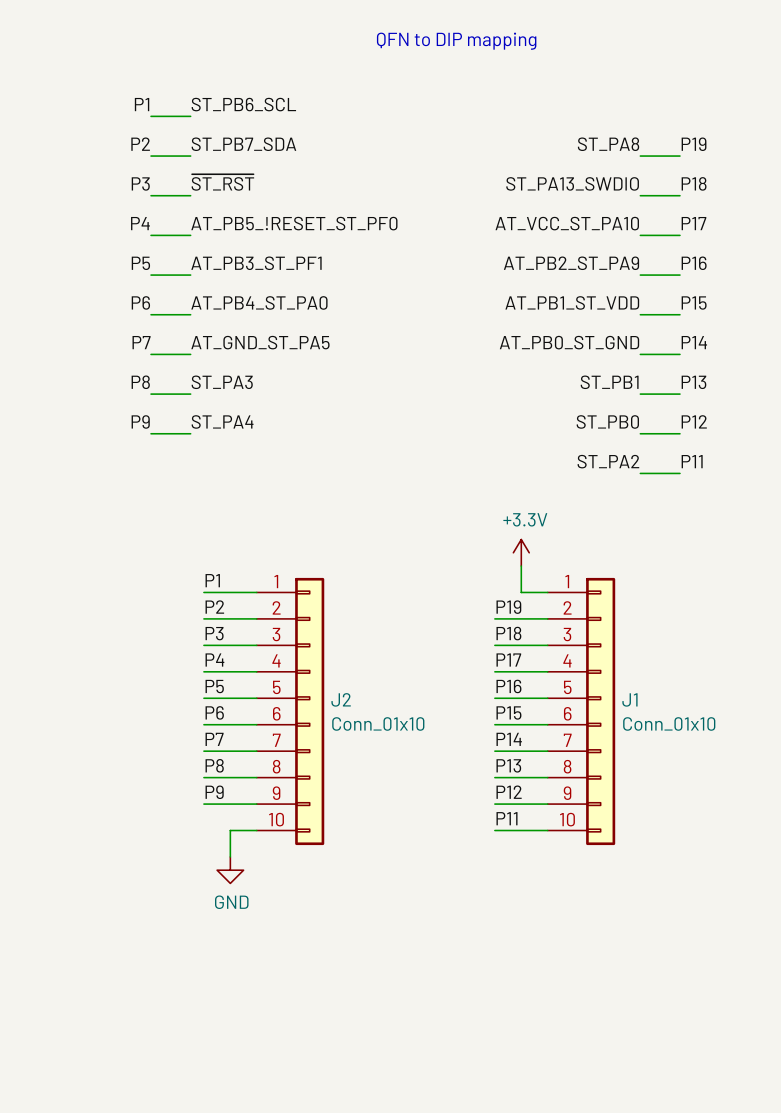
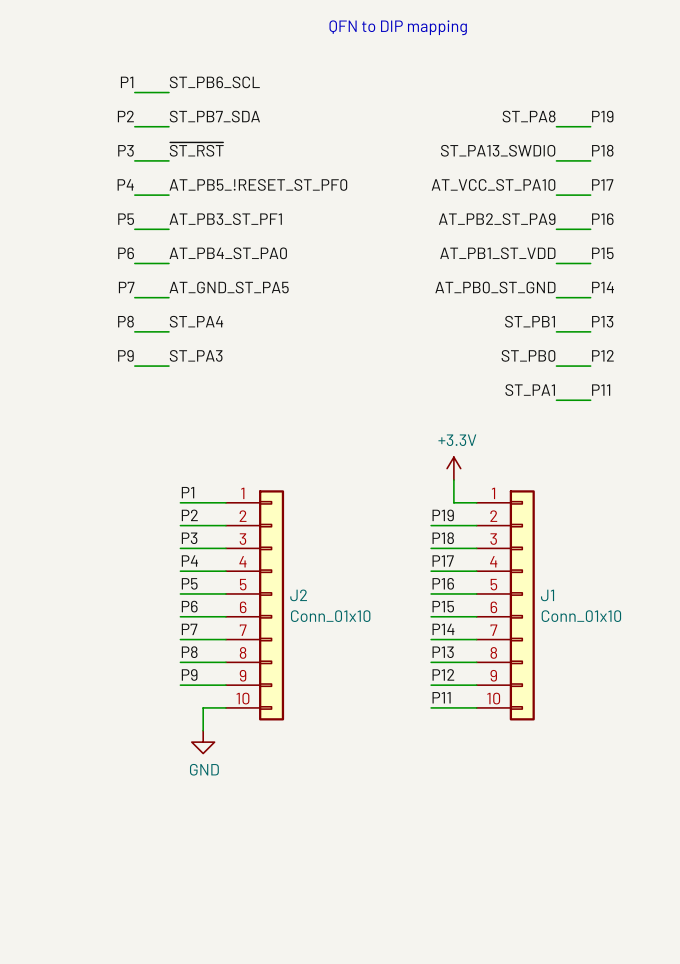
label: ST_PA3 (222, 382) -> ST_PA4 (196, 321)
label: ST_PA4 (222, 421) -> ST_PA3 (196, 355)
label: ST_PA2 (608, 461) -> ST_PA1 (530, 390)

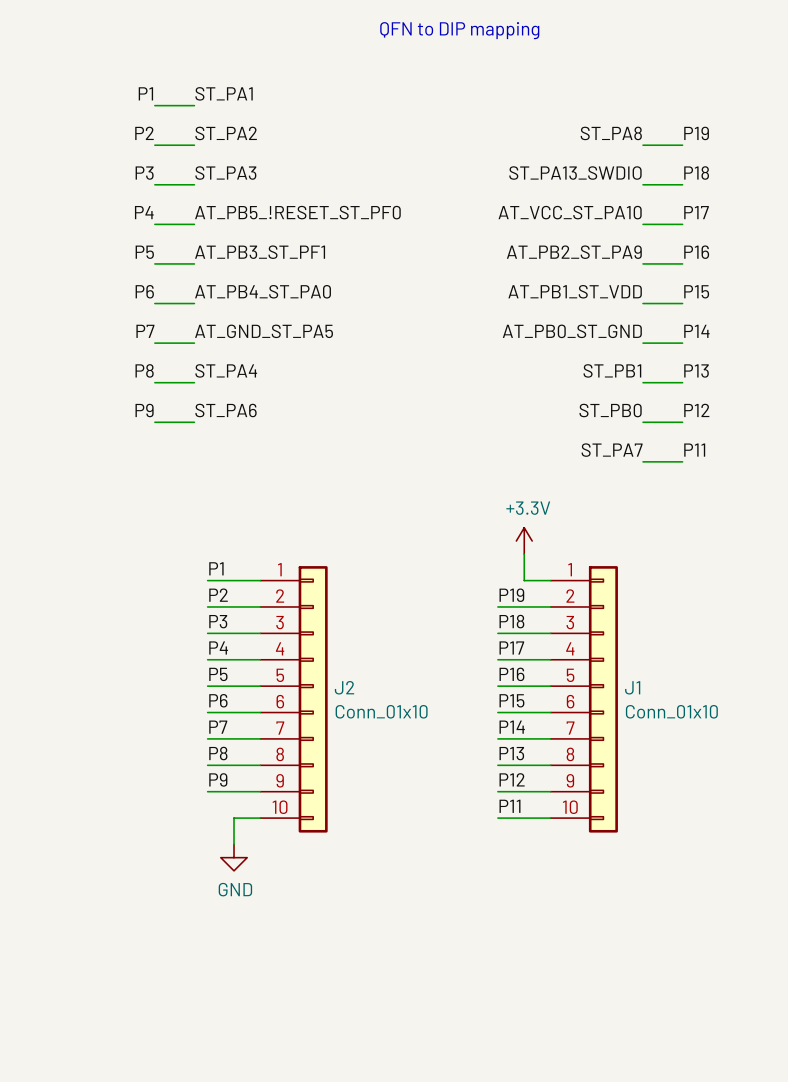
label: ST_PB6_SCL (214, 82) -> ST_PA1 (224, 93)
label: ST_PB7_SDA (214, 116) -> ST_PA2 (226, 133)
label: ~{ST_RST} (196, 149) -> ST_PA3 (225, 173)
label: ST_PA3 (196, 355) -> ST_PA6 (226, 410)
label: ST_PA1 (530, 390) -> ST_PA7 (612, 450)

